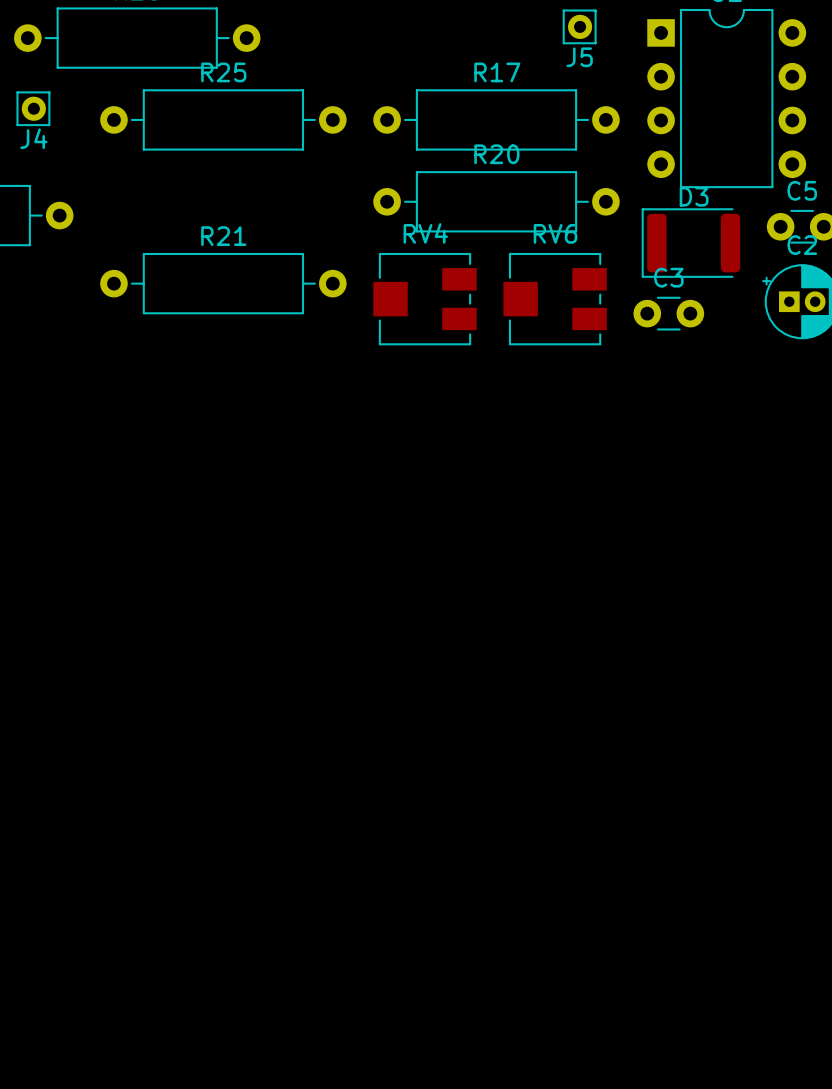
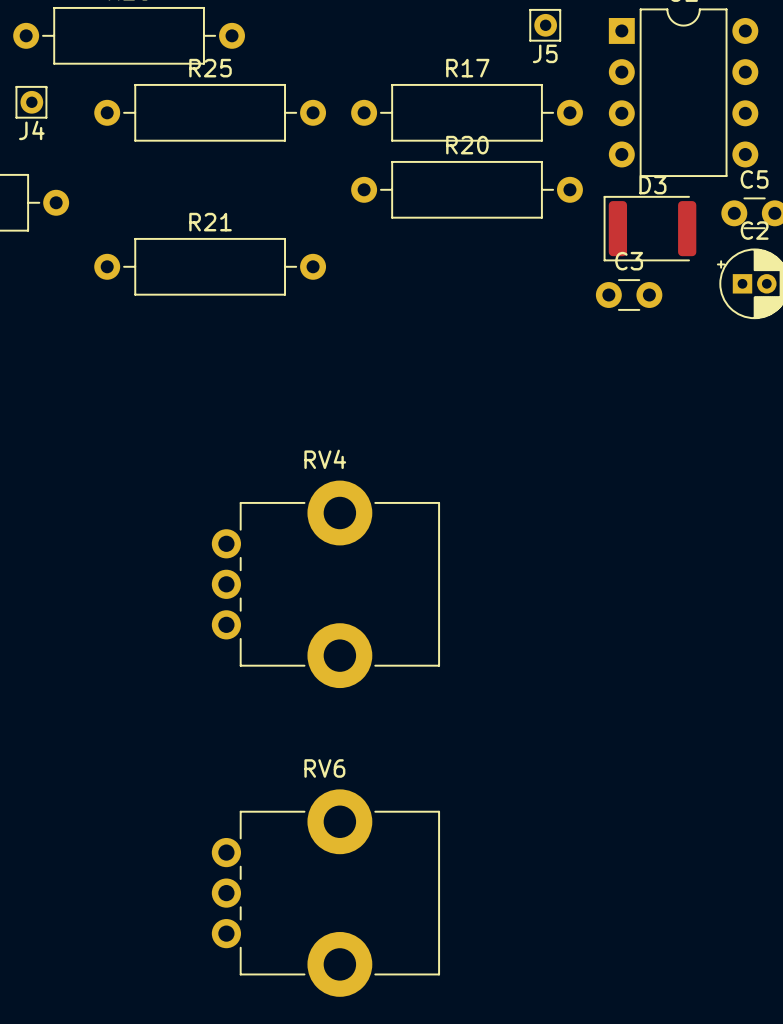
RV4 name position: RV4 (425, 233) -> RV4 (325, 459)
RV6 name position: RV6 (555, 233) -> RV6 (324, 768)
RV4 footprint: [373, 252, 477, 346] -> [211, 480, 441, 689]
RV6 footprint: [503, 252, 607, 346] -> [211, 789, 441, 997]

